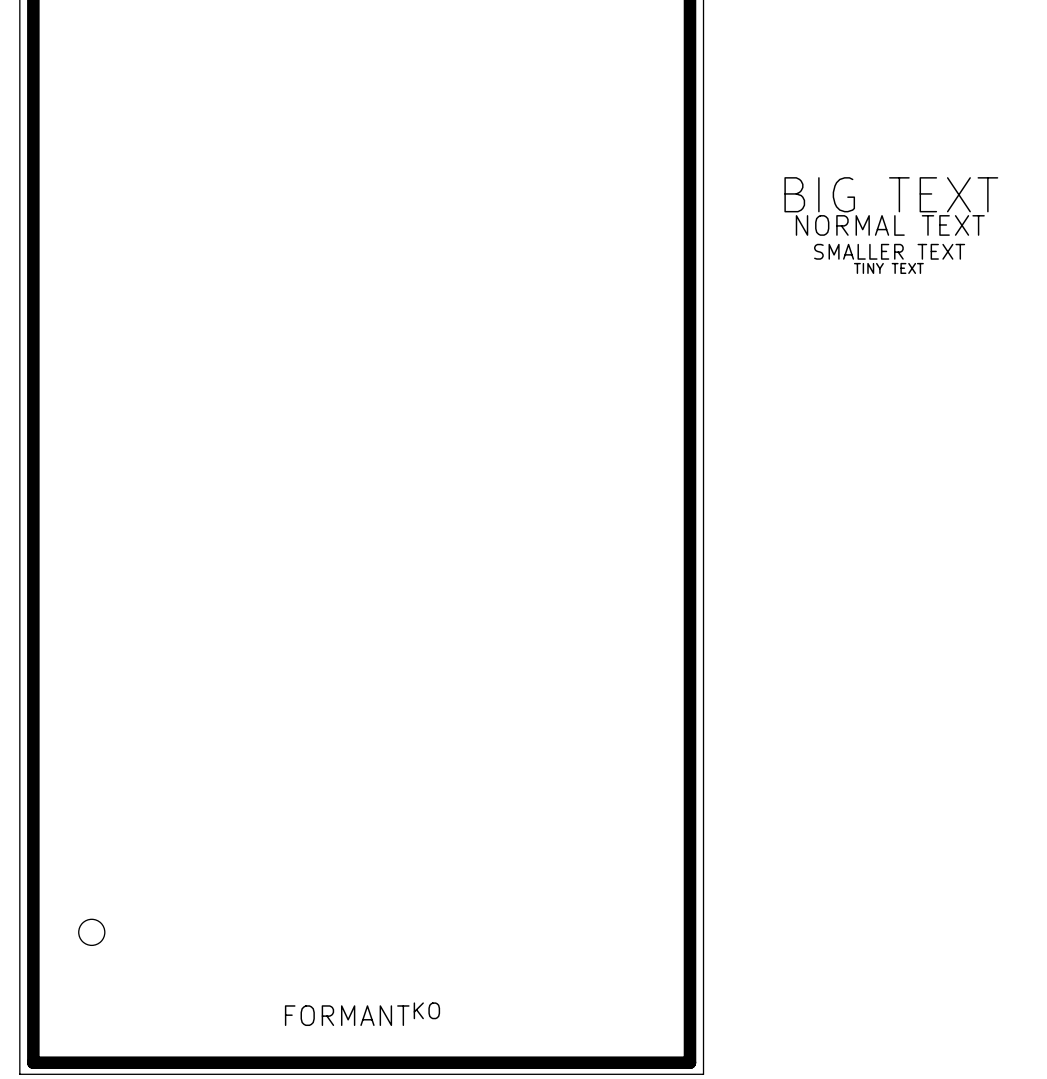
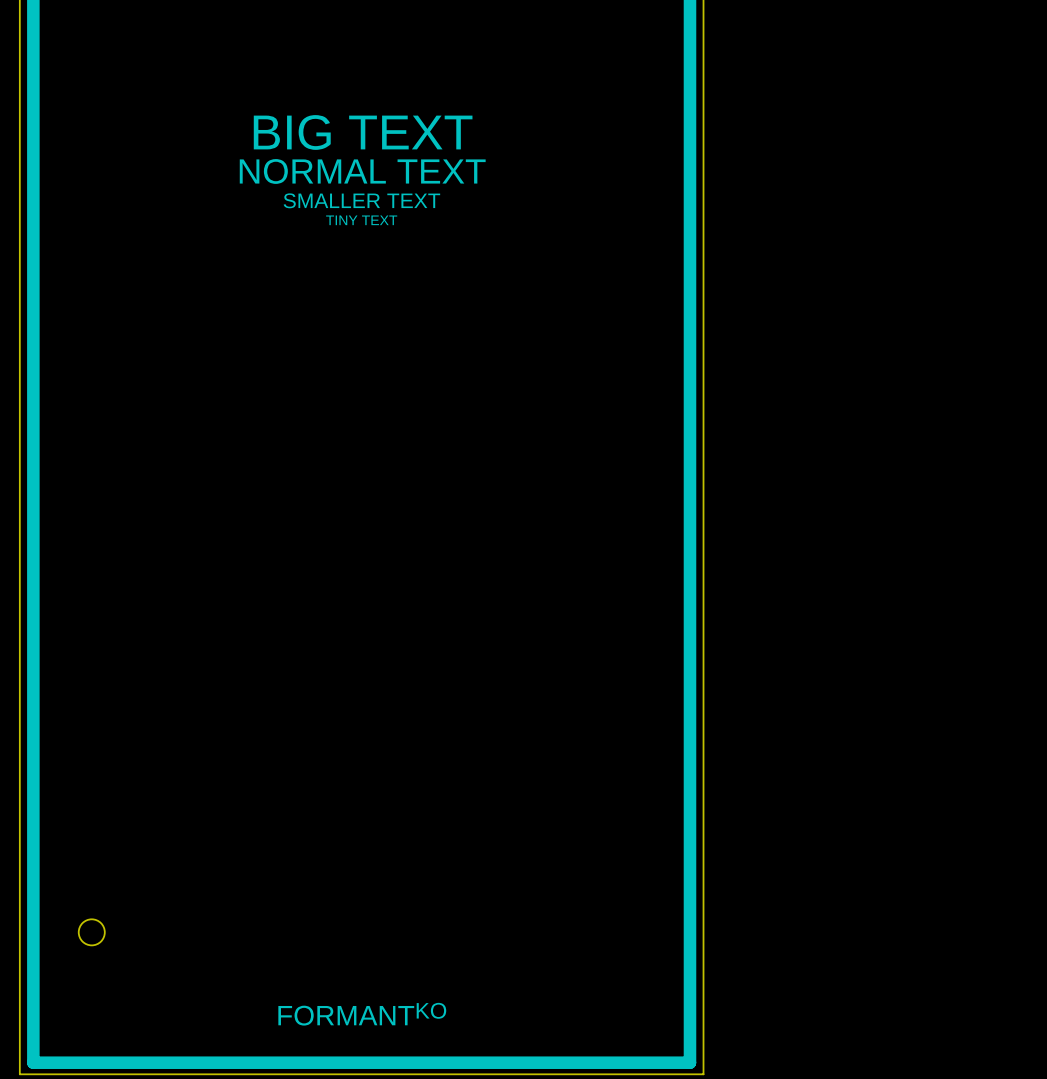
text: none -> BIG TEXT (363, 132)
text: none -> NORMAL TEXT (362, 171)
text: BIG TEXT (891, 194) -> none
text: none -> SMALLER TEXT (361, 200)
text: none -> TINY TEXT (361, 220)
text: NORMAL TEXT (890, 225) -> none
text: SMALLER TEXT (889, 251) -> none
text: TINY TEXT (888, 268) -> none

